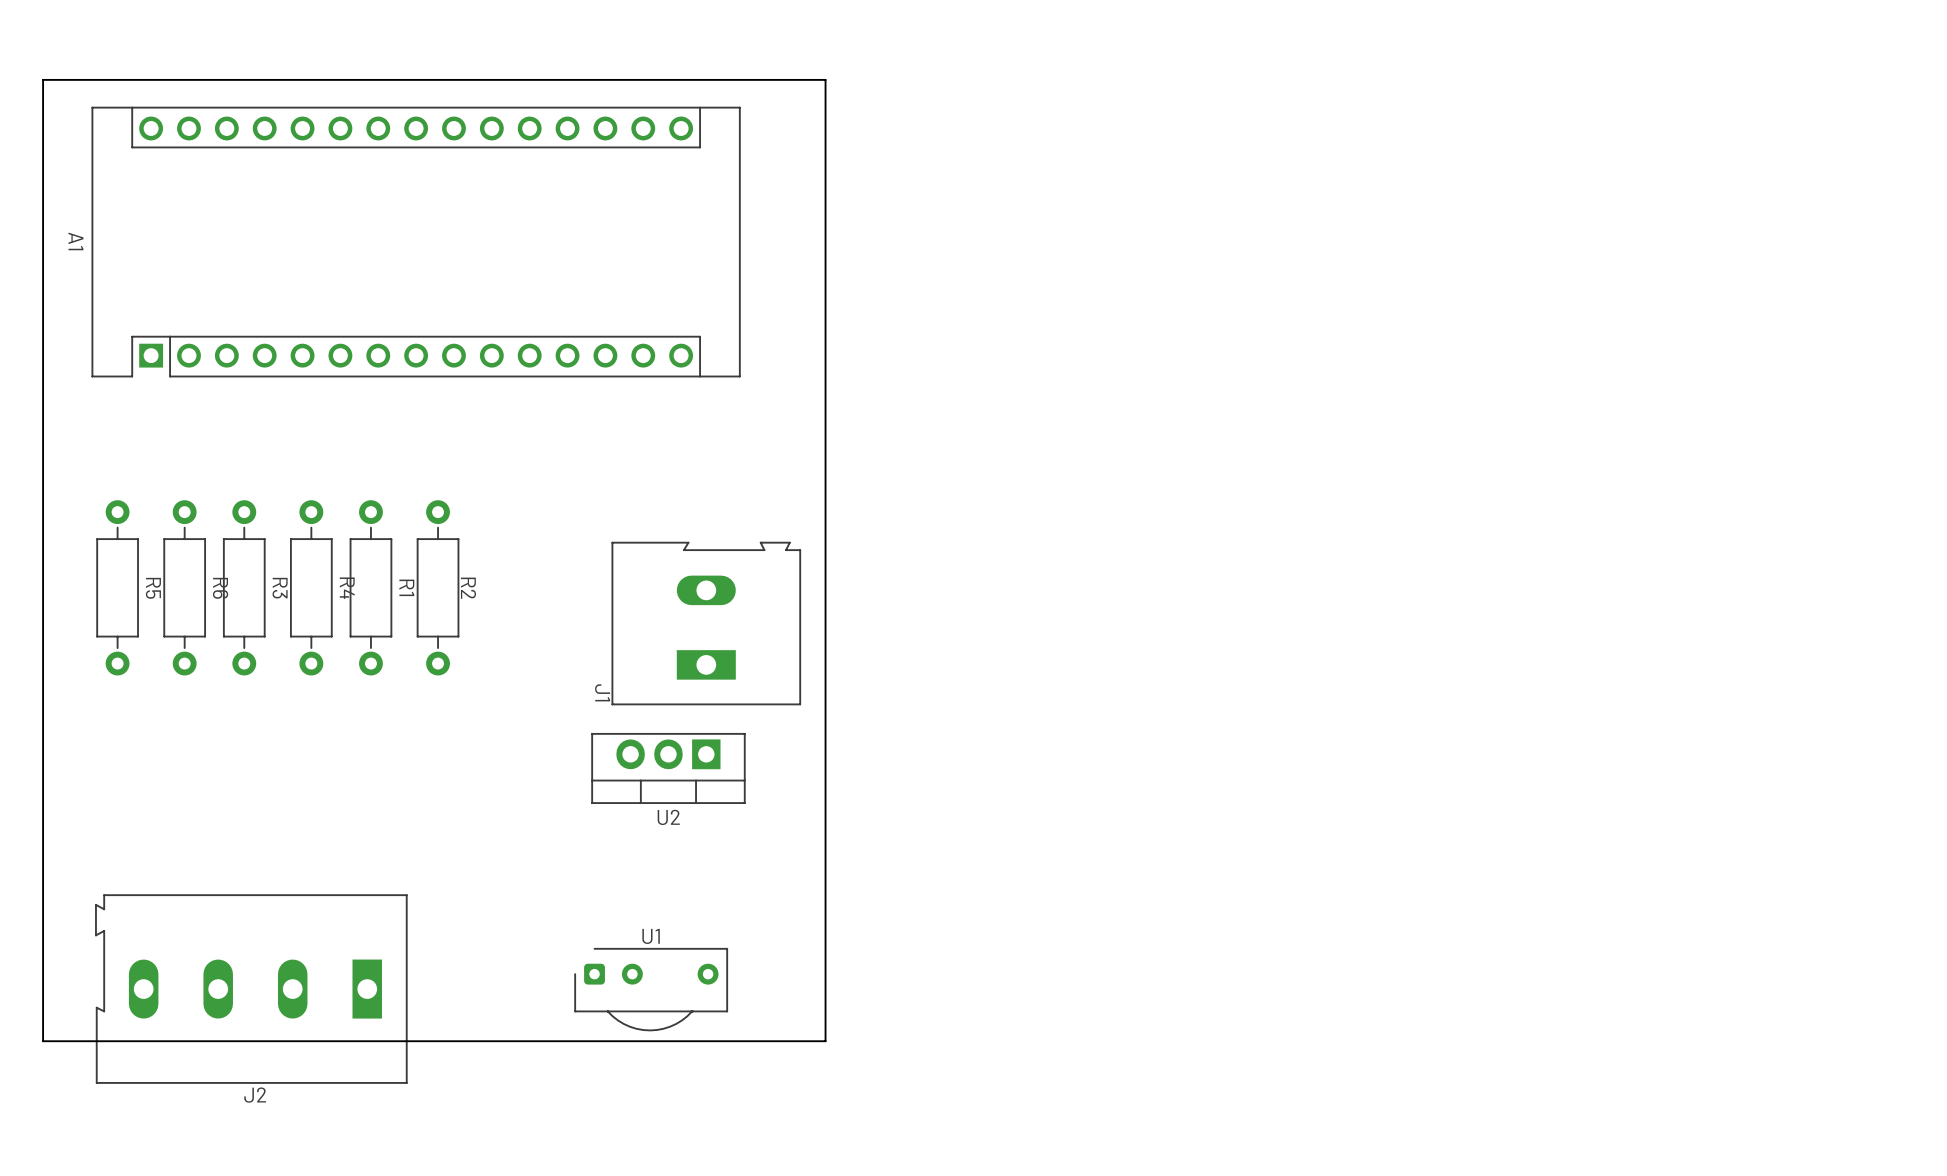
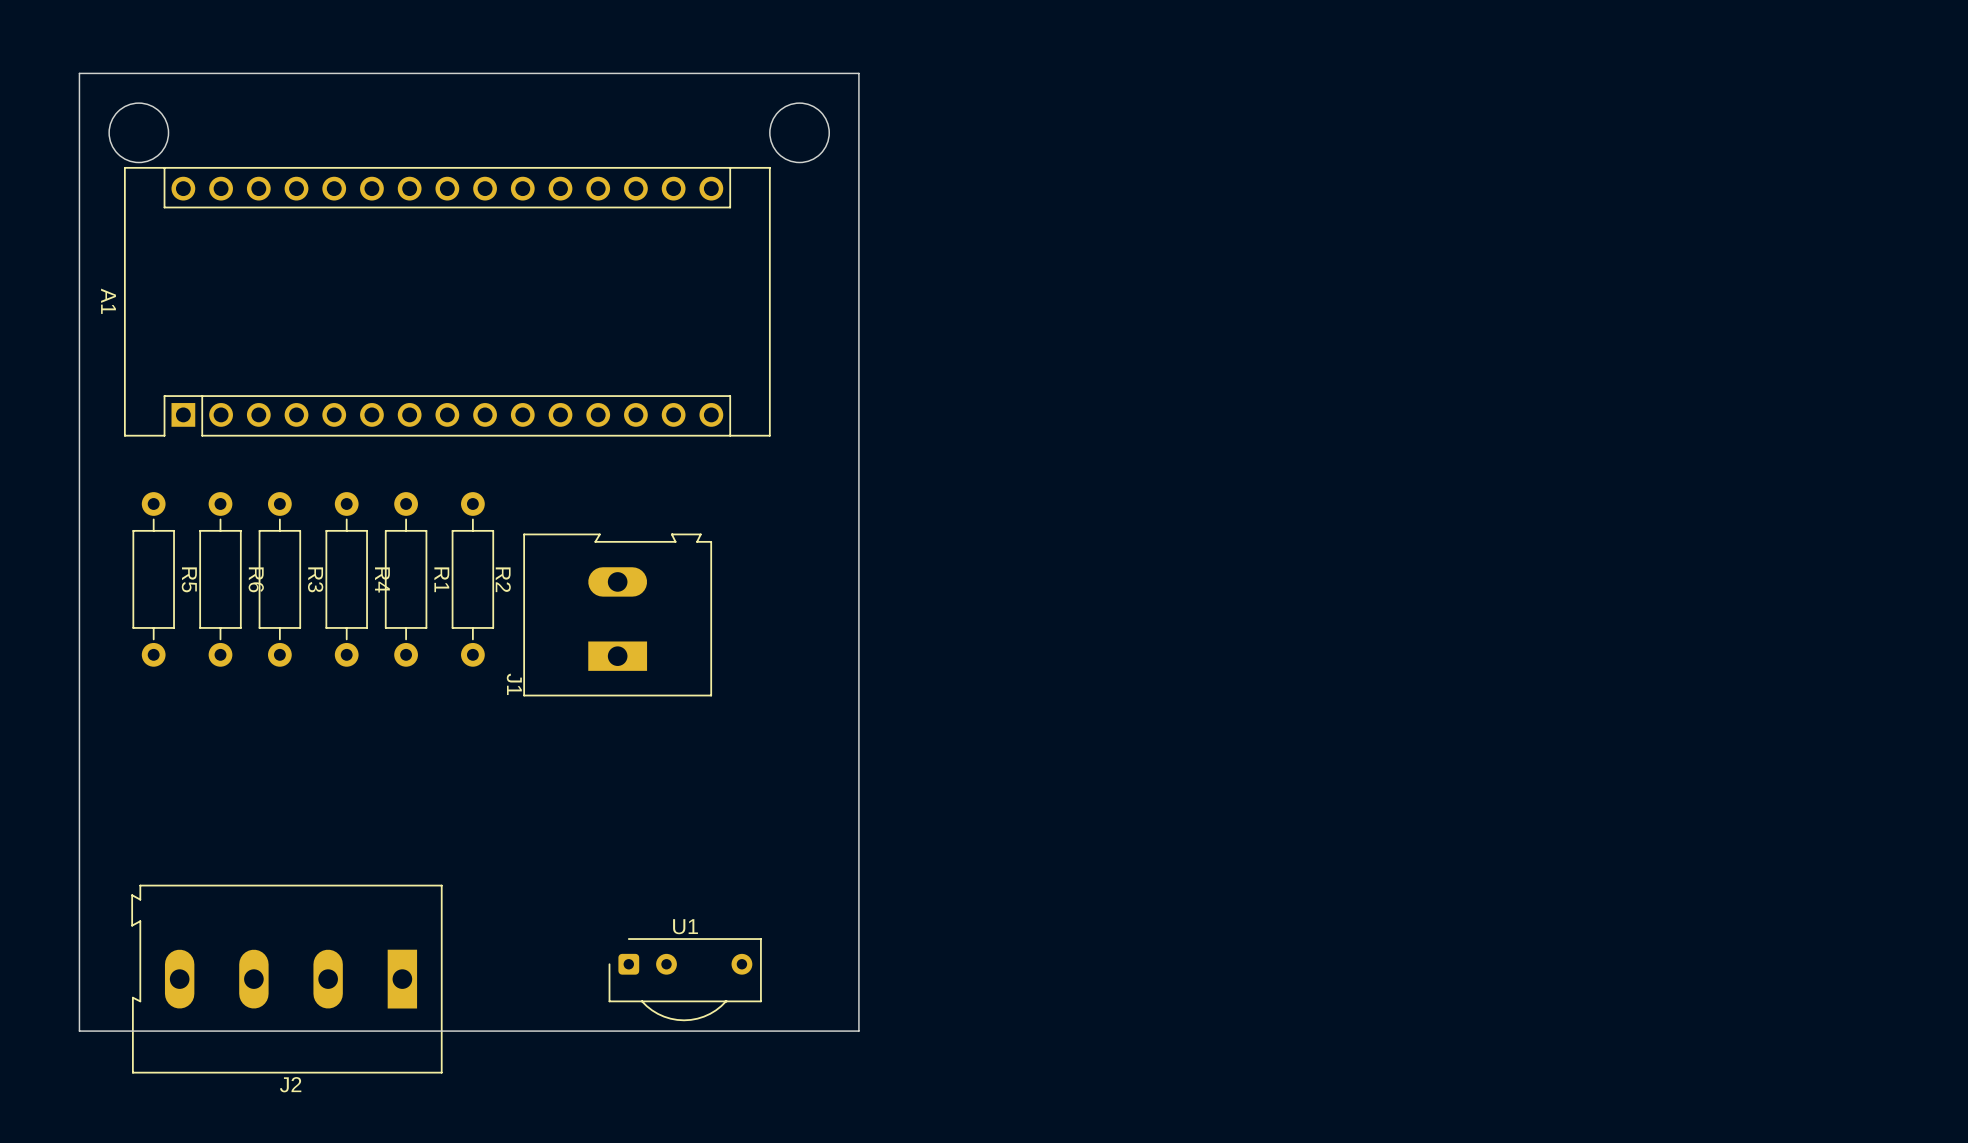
round board edge: none -> [108, 102, 169, 163]
round board edge: none -> [769, 102, 830, 163]
A1 position: (416, 242) -> (447, 301)
J1 position: (706, 623) -> (617, 614)
U2: (668, 768) -> none

